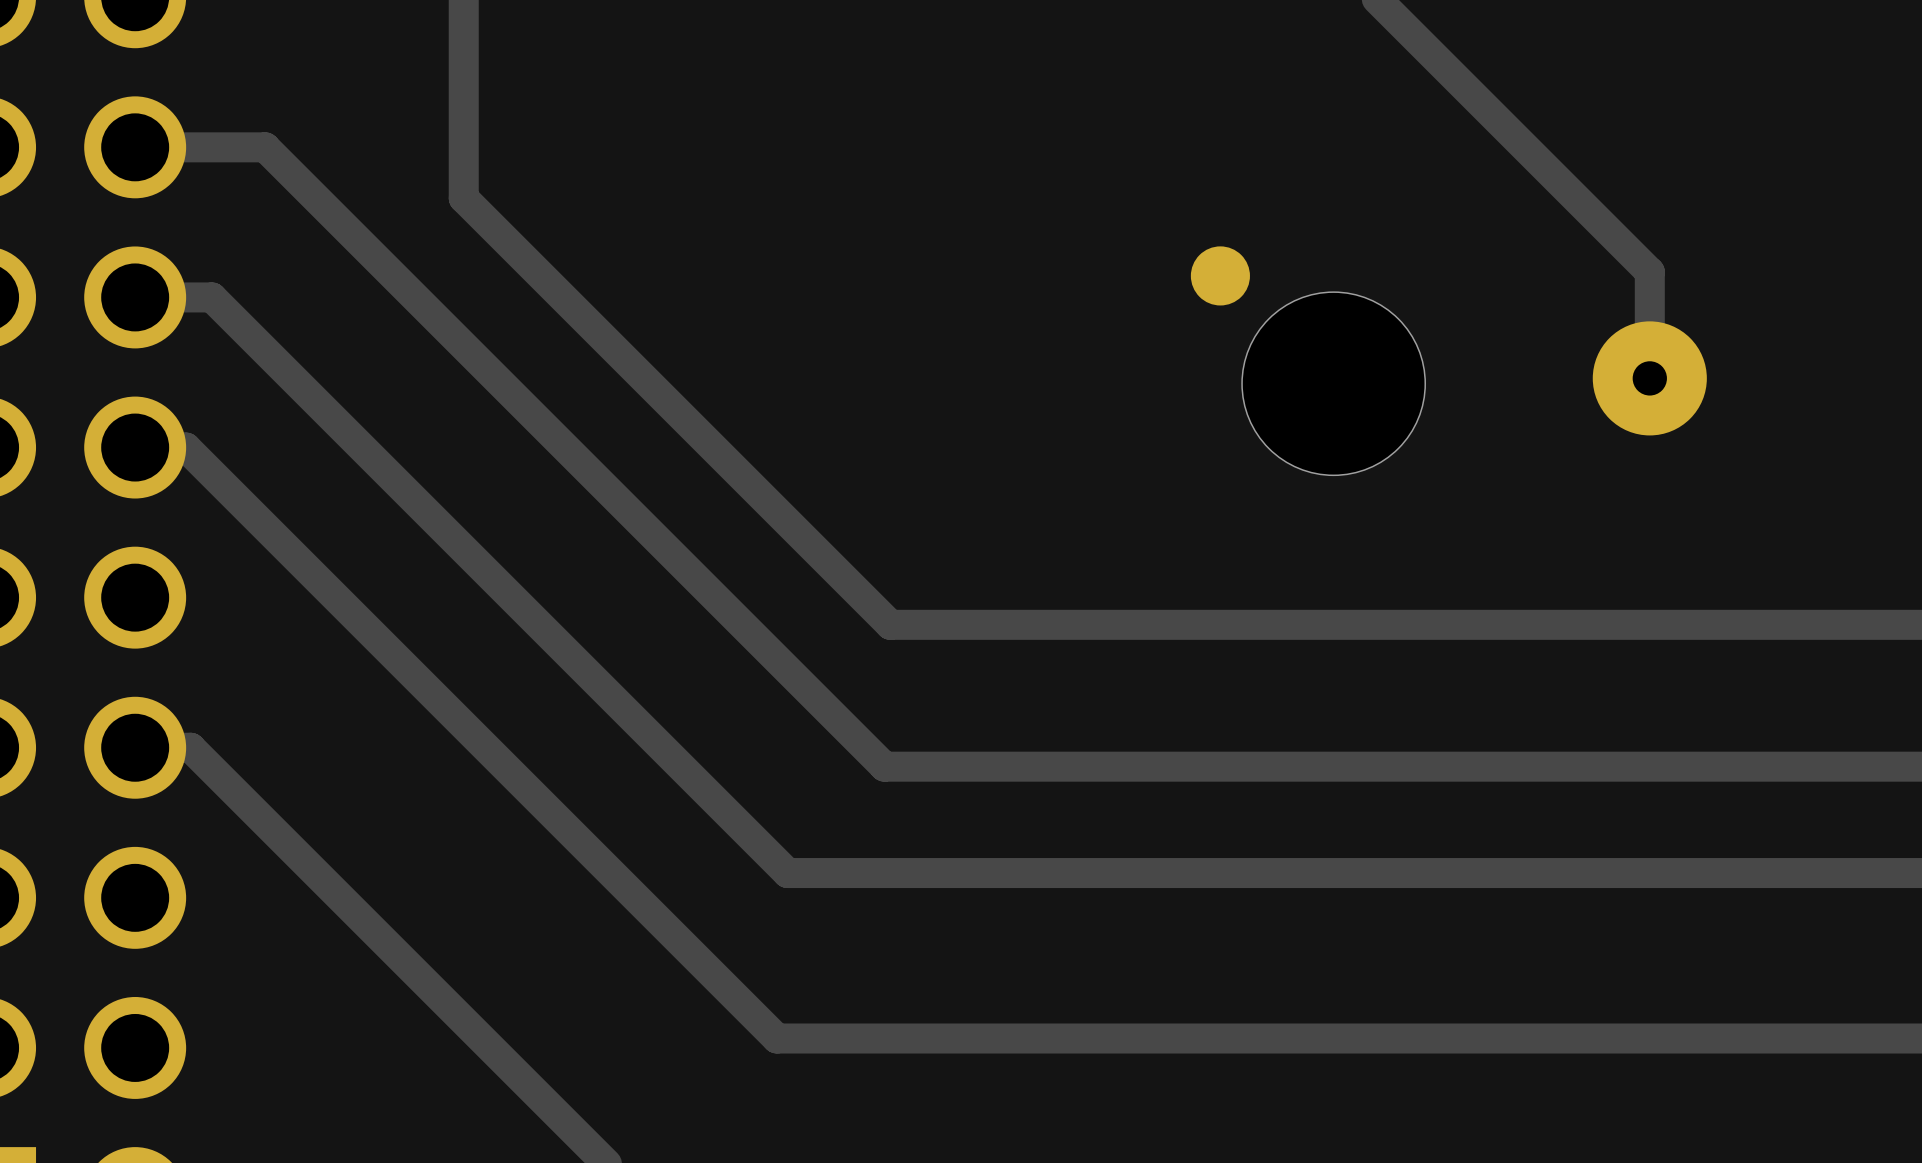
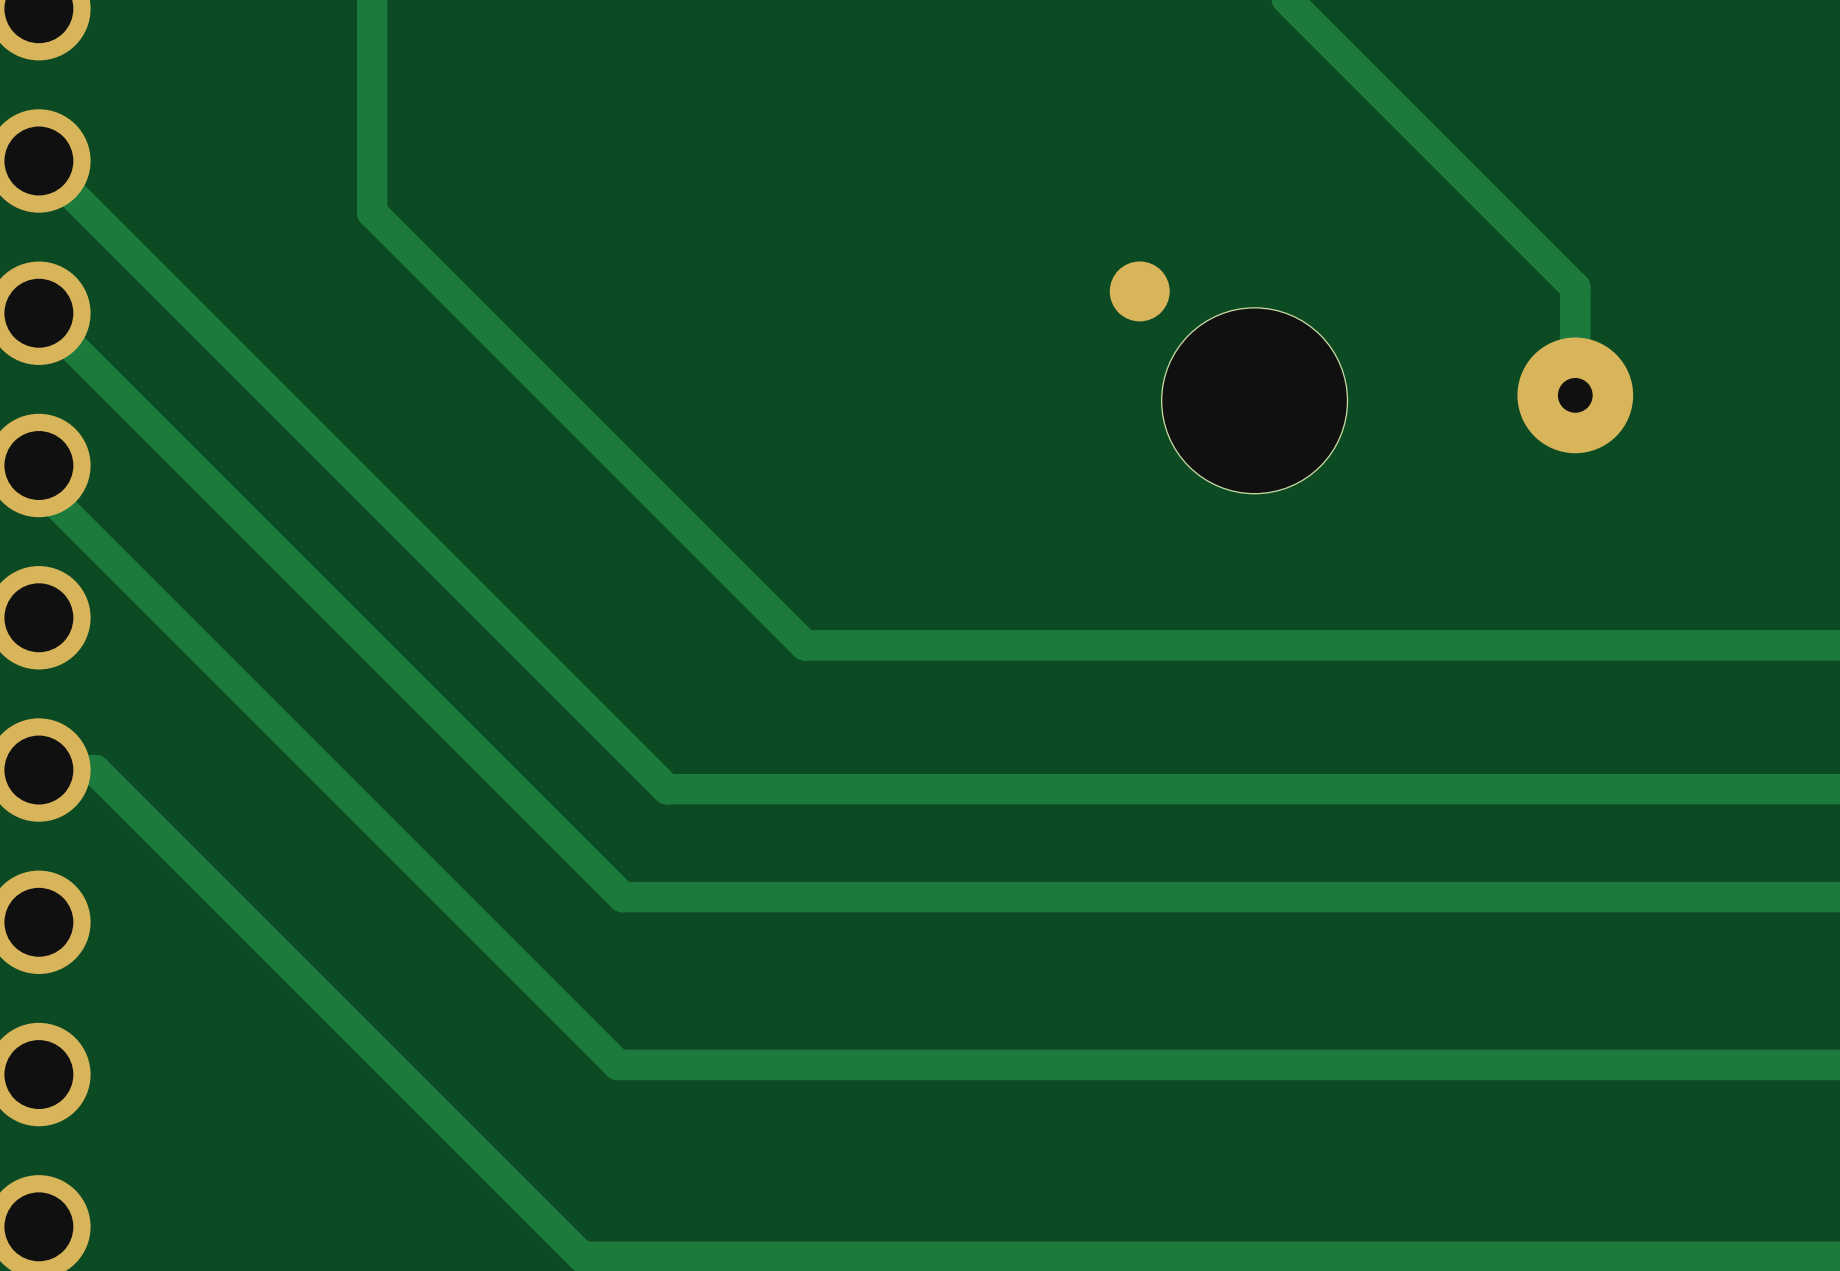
track: (135, 147) (265, 147) (884, 766) -> (38, 160) (667, 789) (799, 789)
track: (135, 297) (211, 297) (787, 873) -> (38, 313) (622, 897) (700, 897)
track: (135, 447) (185, 447) (776, 1038) -> (38, 465) (38, 485) (617, 1064) (689, 1064)

